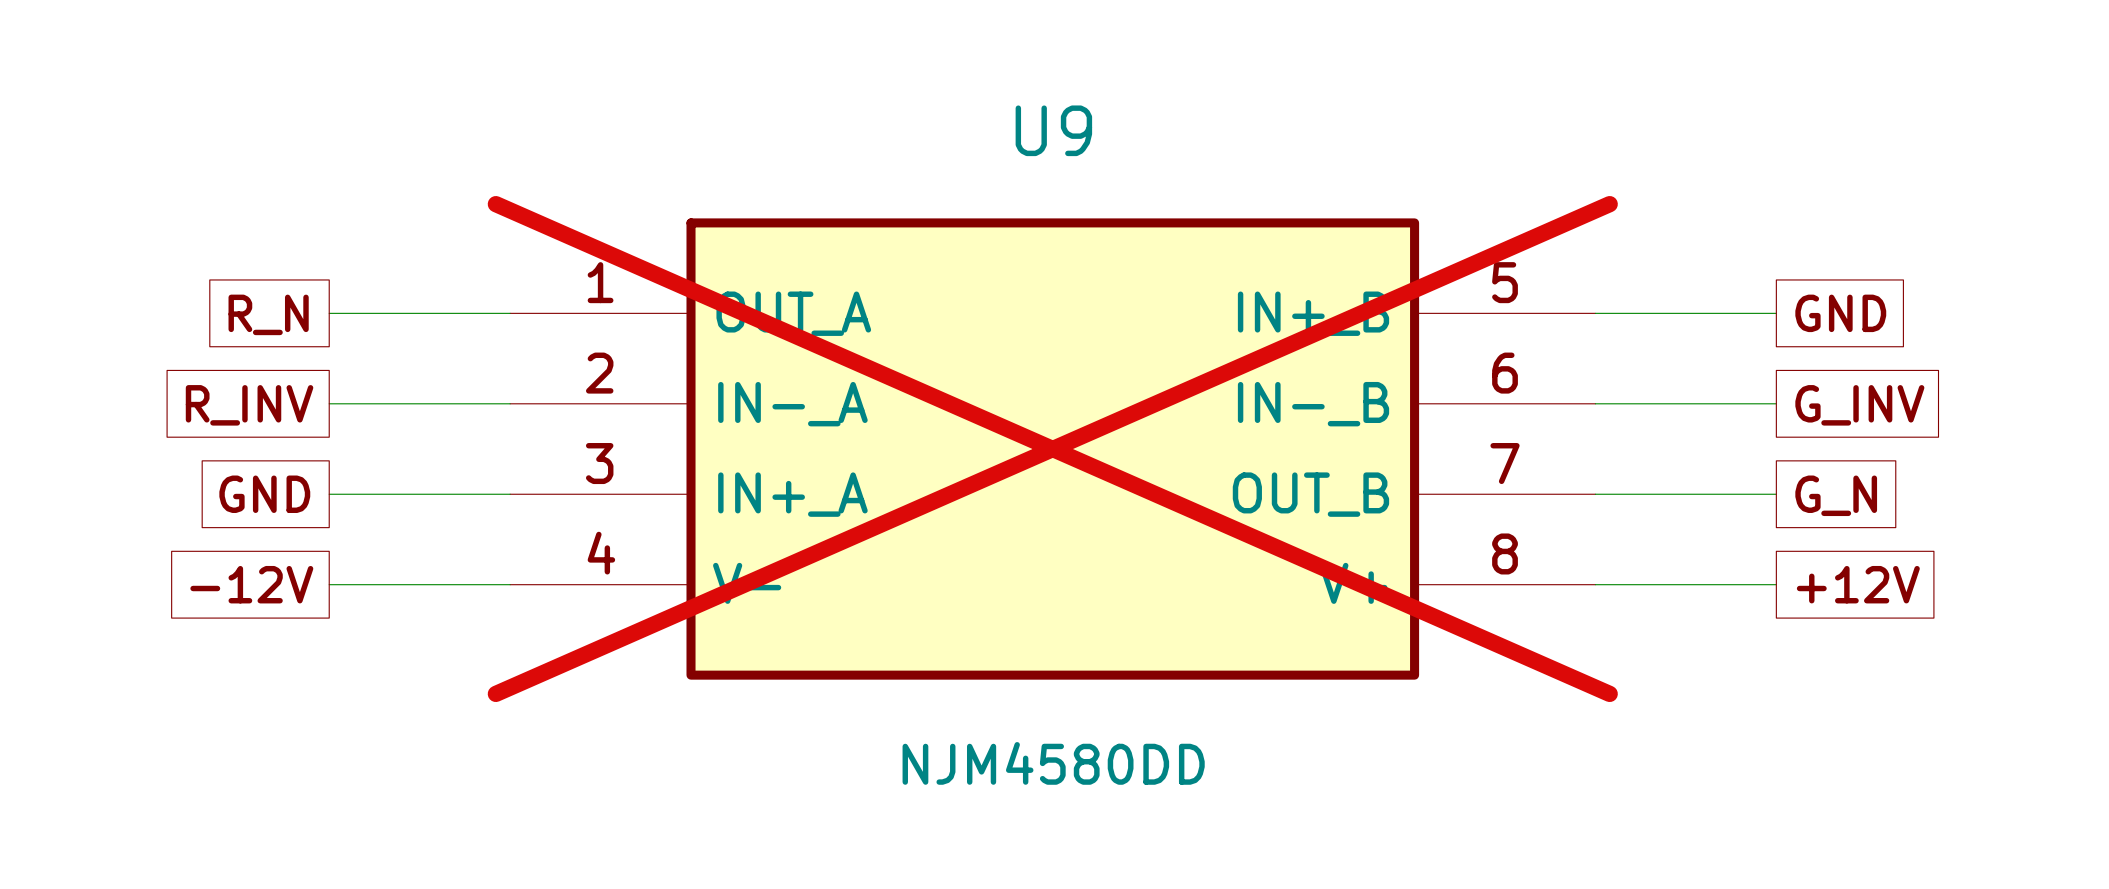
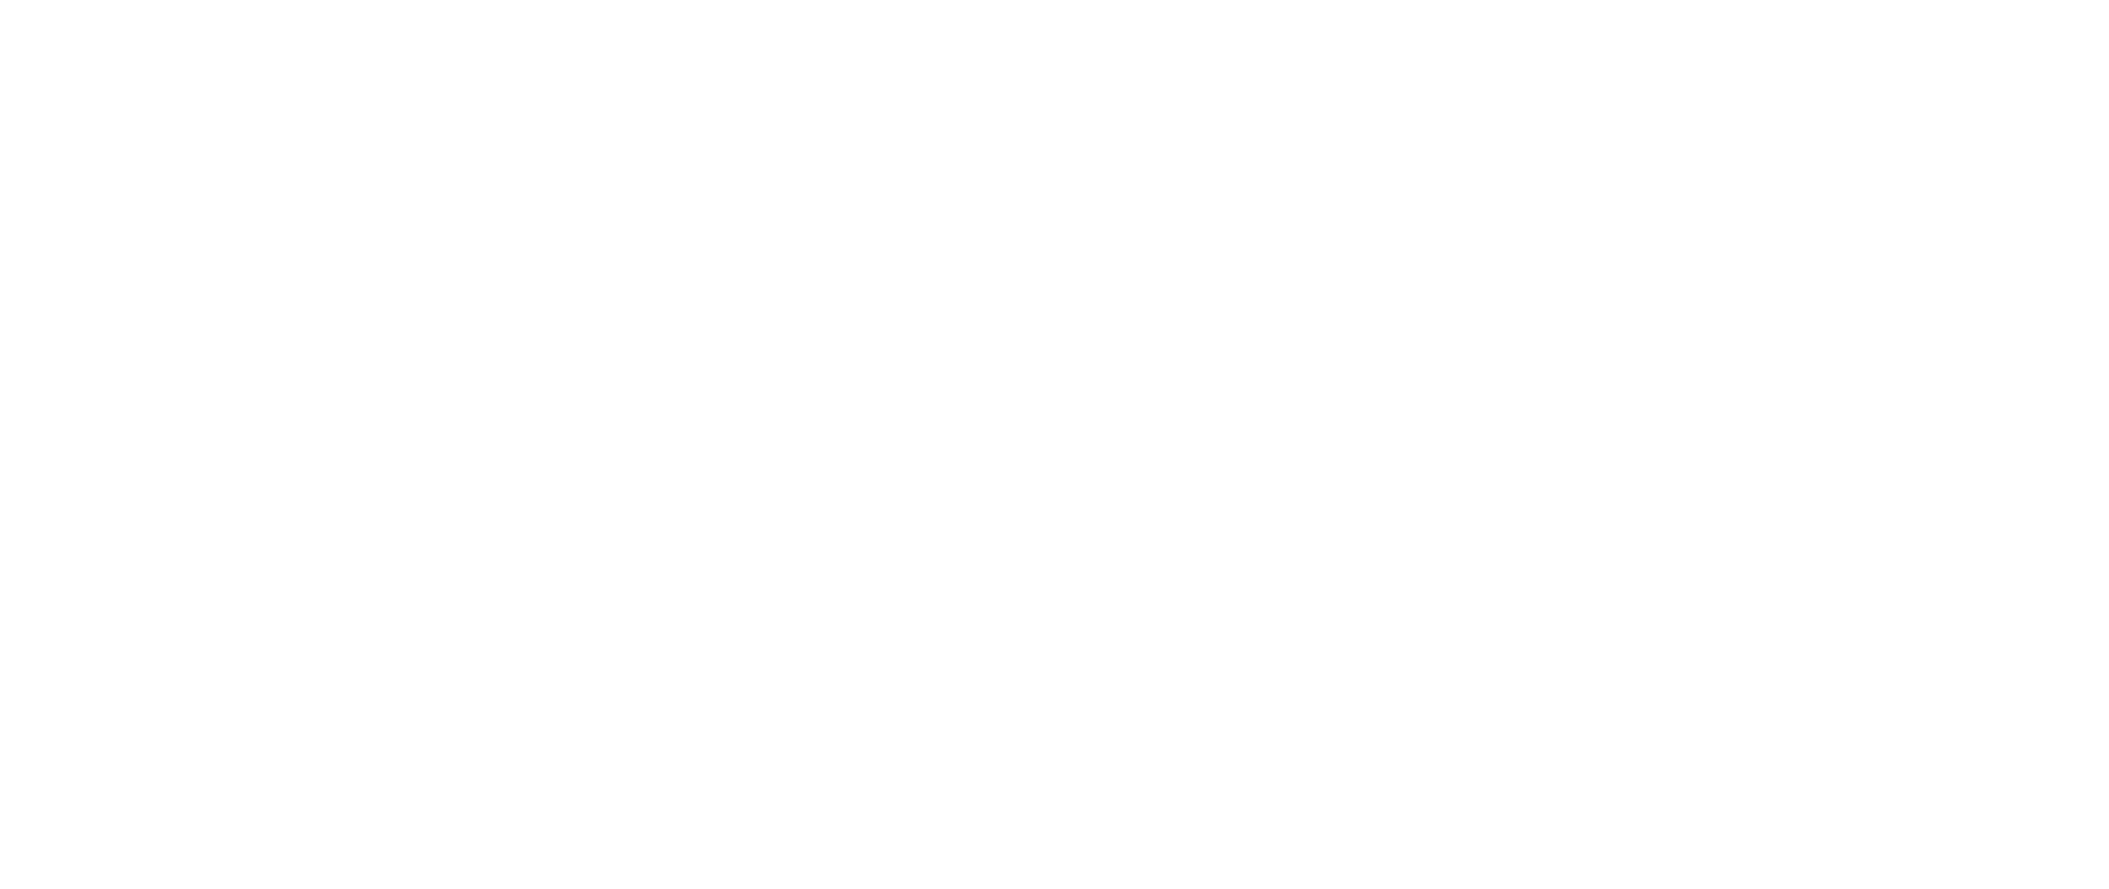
wire: (329, 313) (510, 313) -> none
wire: (1595, 313) (1776, 313) -> none
global label: GND (1840, 313) -> none
global label: R_N (268, 314) -> none
wire: (329, 403) (510, 403) -> none
wire: (1595, 403) (1776, 403) -> none
global label: R_INV (249, 405) -> none
global label: G_INV (1859, 405) -> none
U9: NJM4580DD (1052, 449) -> none
global label: GND (264, 494) -> none
wire: (329, 494) (510, 494) -> none
wire: (1595, 494) (1776, 494) -> none
global label: G_N (1836, 495) -> none
global label: -12V (251, 584) -> none
wire: (329, 584) (510, 584) -> none
wire: (1595, 584) (1776, 584) -> none
global label: +12V (1858, 584) -> none

